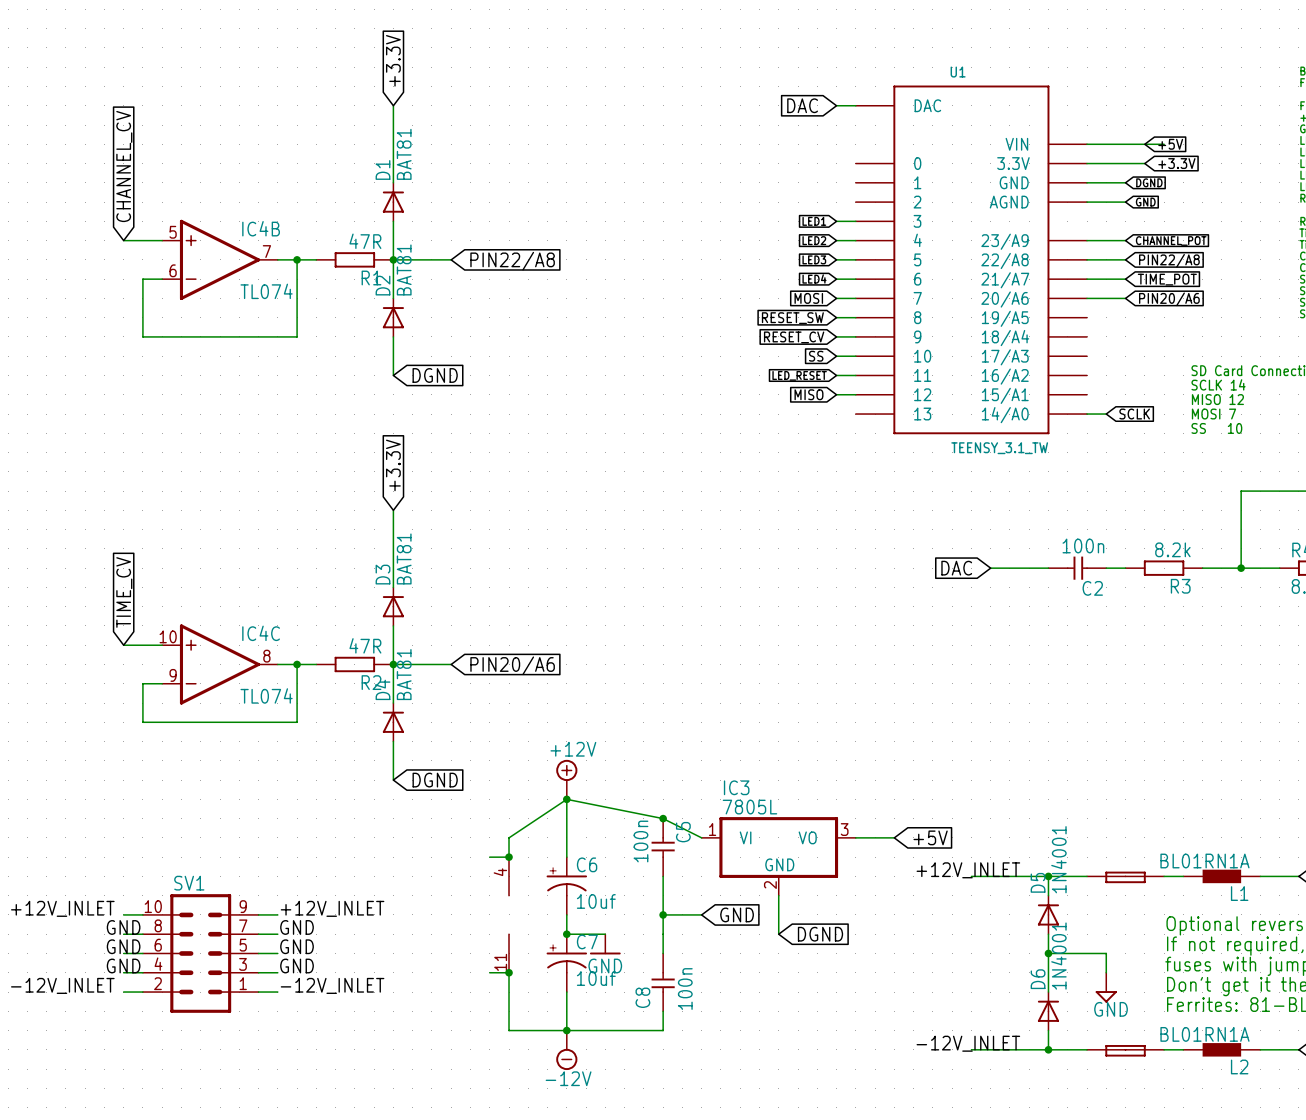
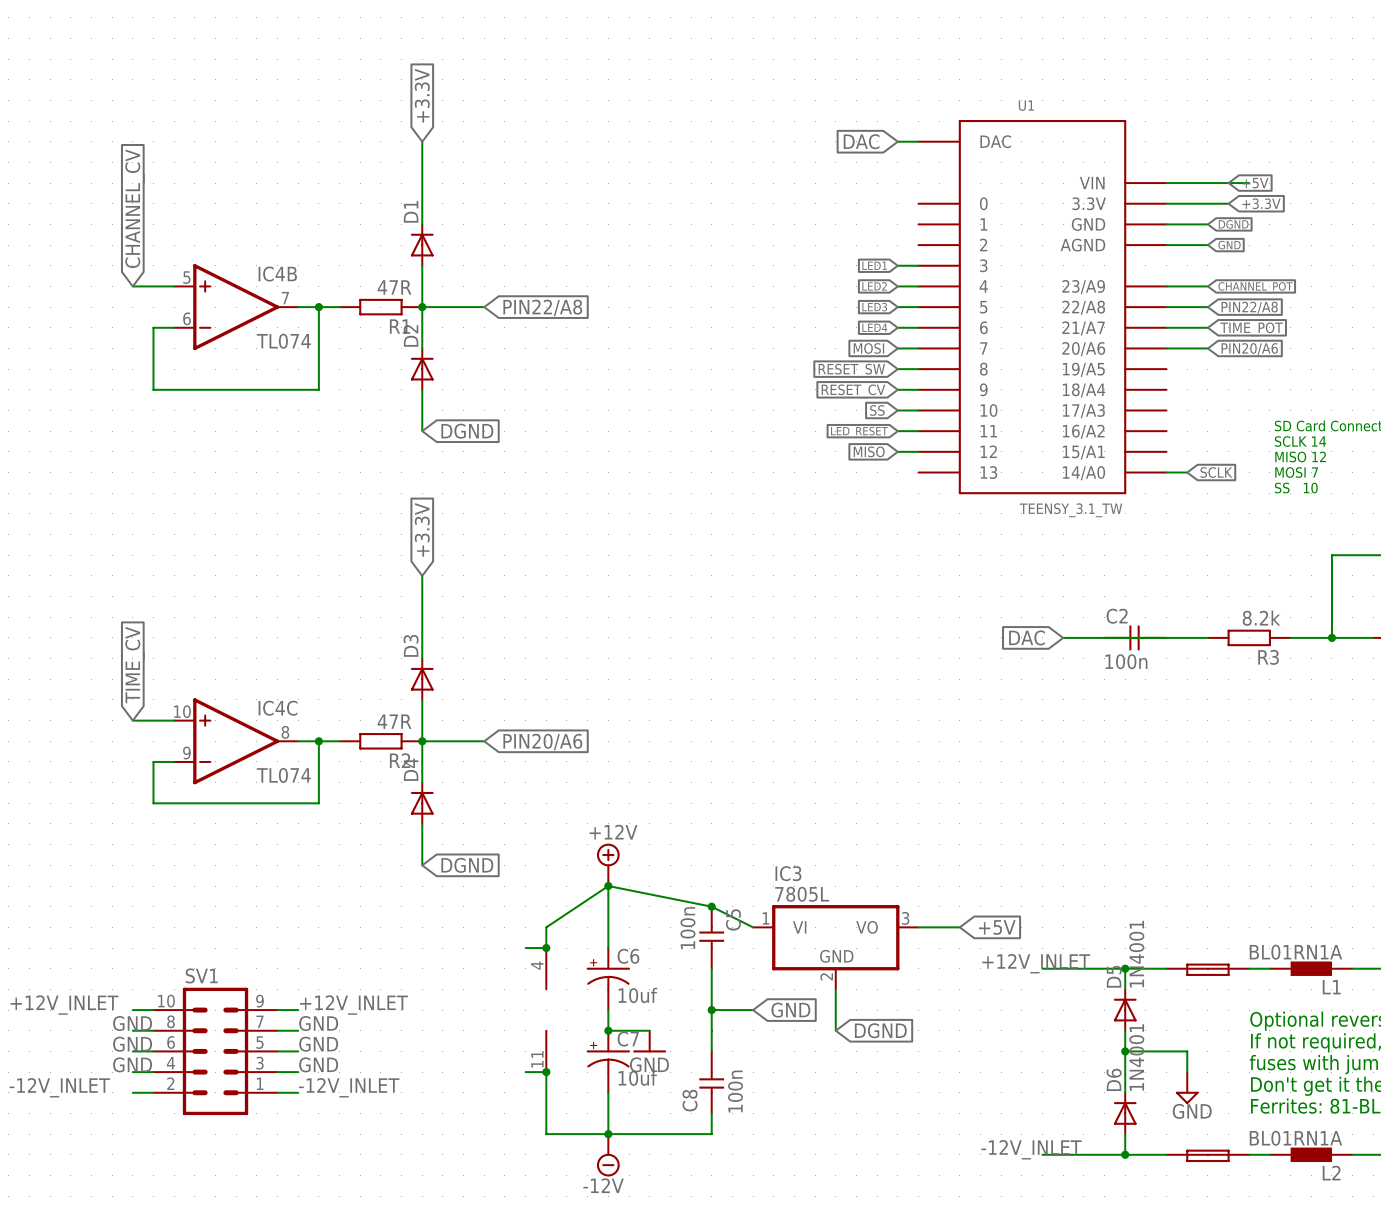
D1 value: BAT81 (404, 154) -> none
D2 value: BAT81 (404, 269) -> none
D3 value: BAT81 (404, 558) -> none
C2 rotation: 0° (1077, 568) -> 180° (1135, 637)
D4 value: BAT81 (404, 674) -> none

